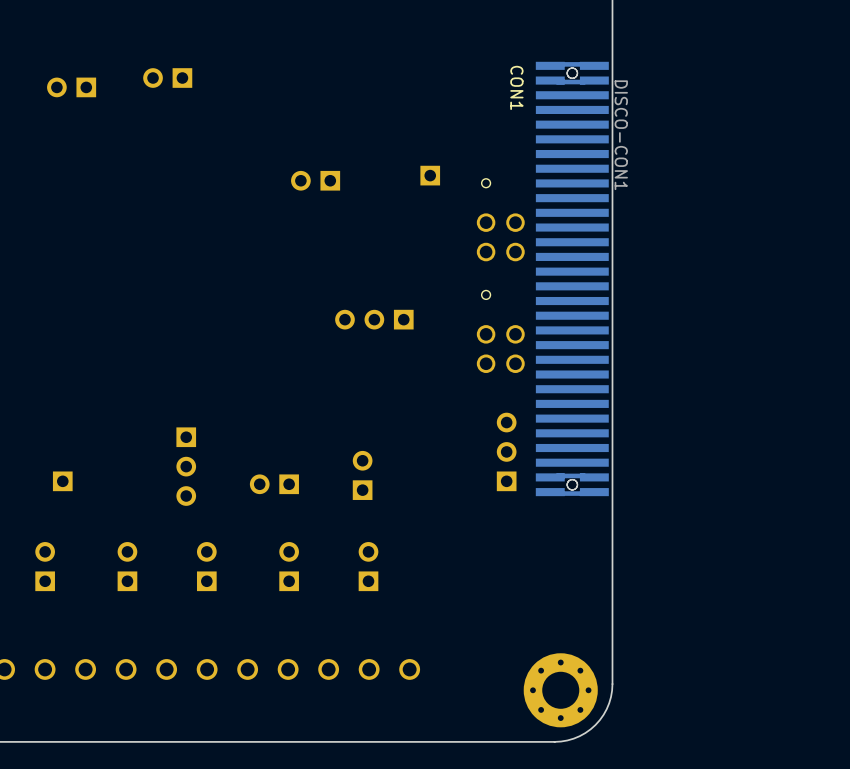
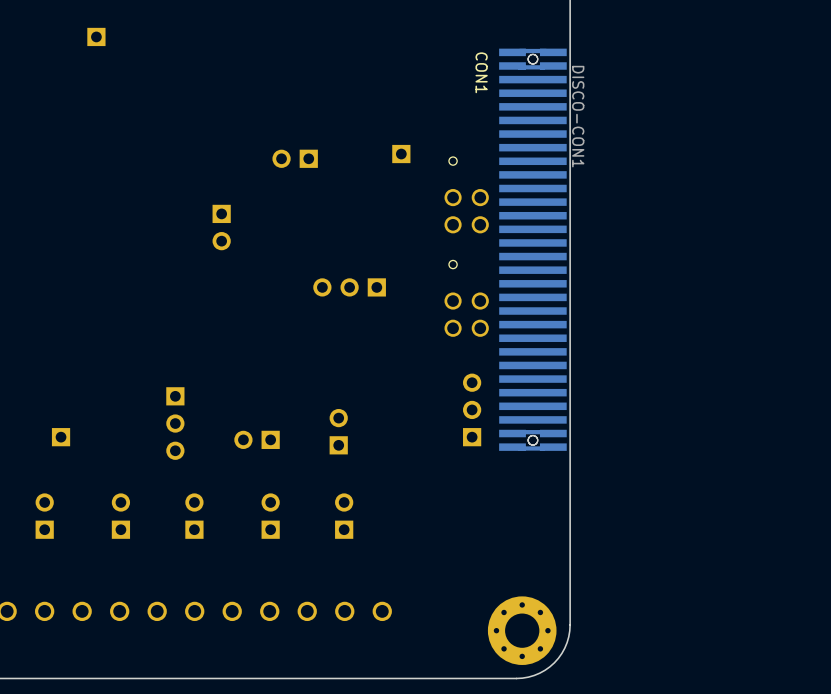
part: none -> (96, 36)
part: (167, 78) -> none
part: (71, 87) -> none
part: none -> (221, 227)

